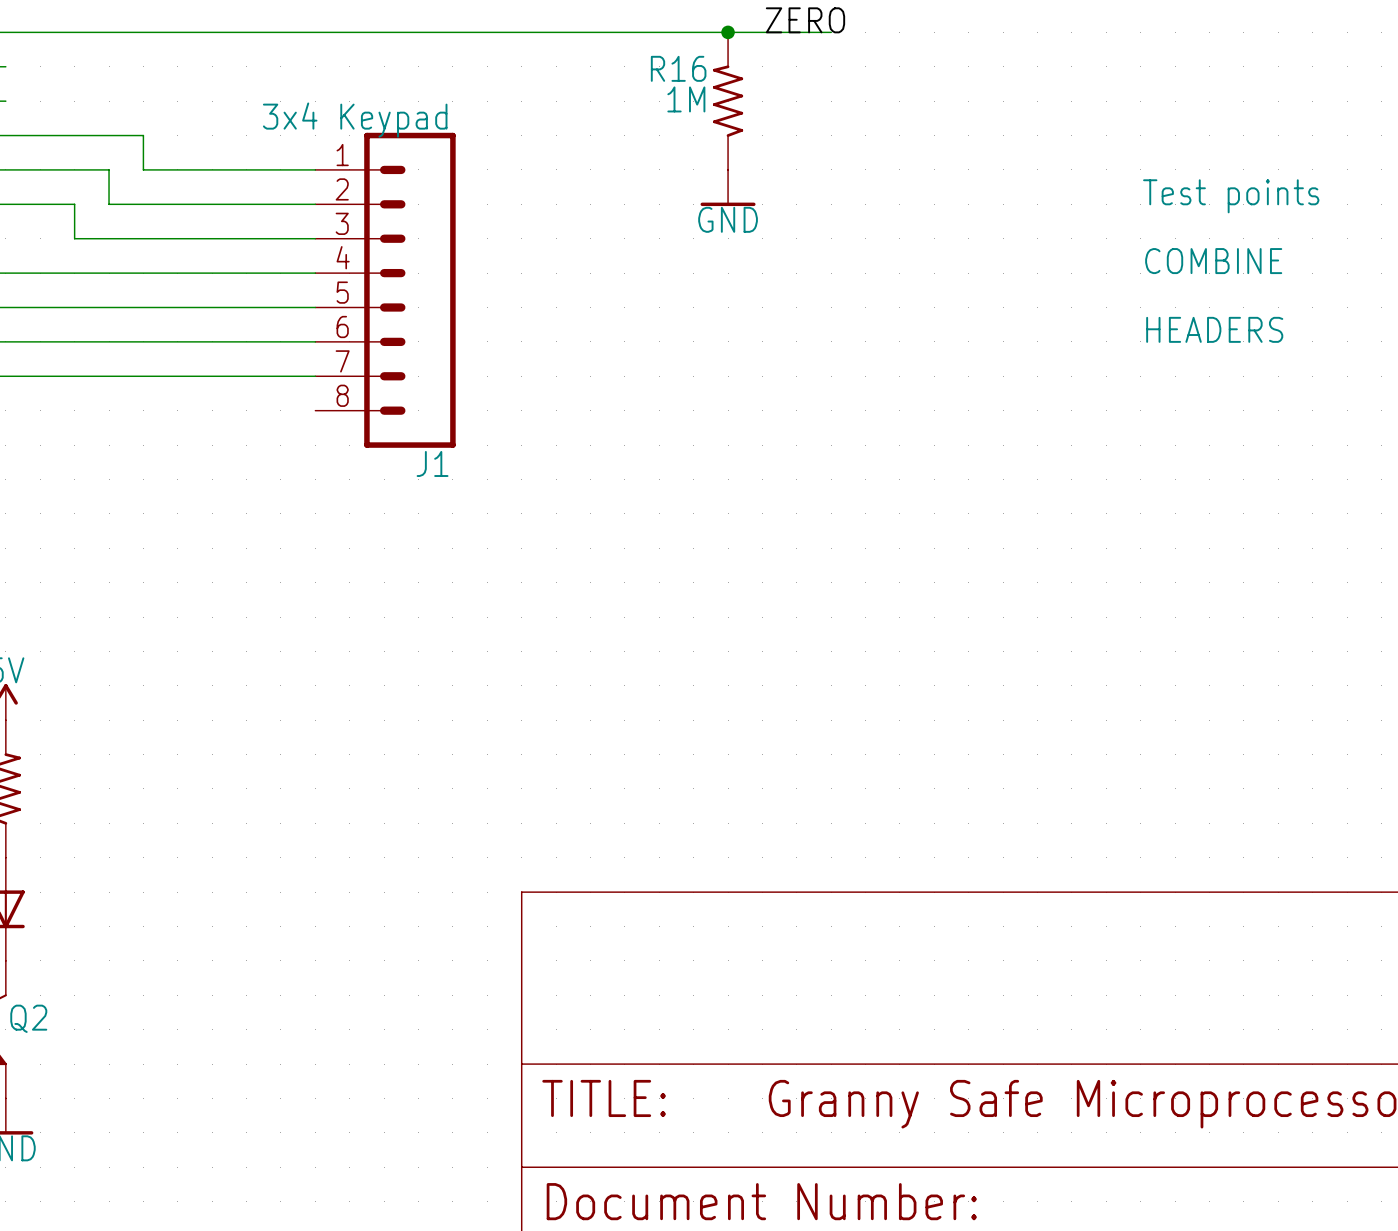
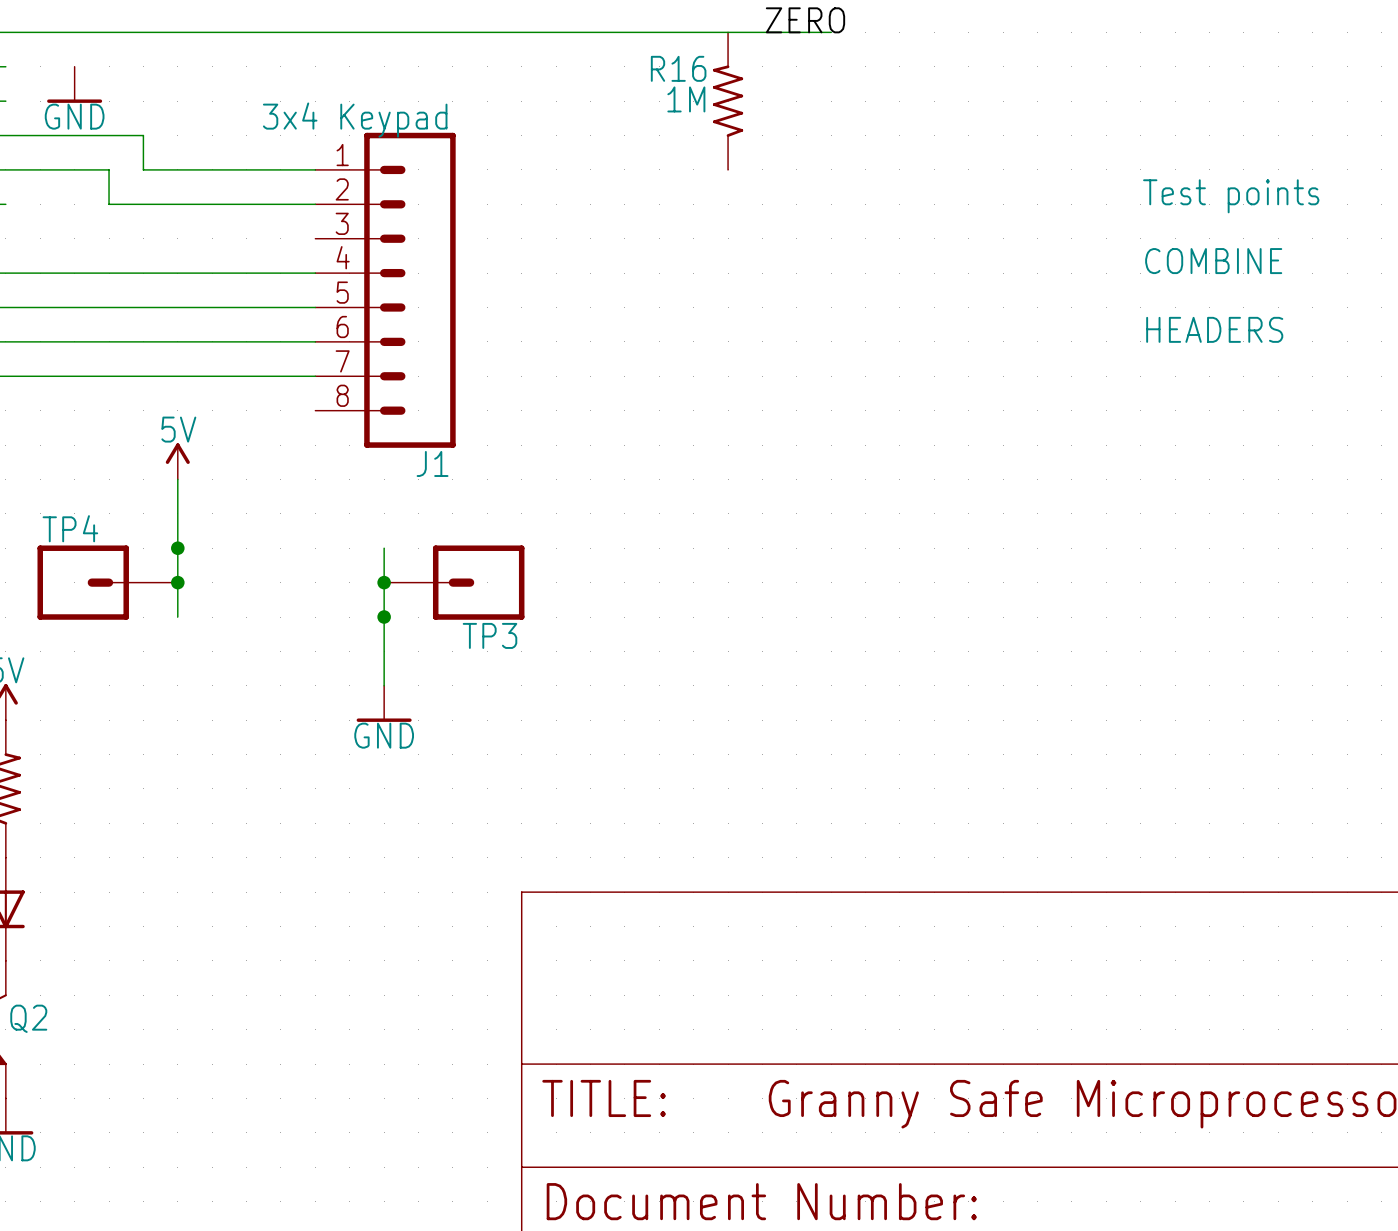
junction: (728, 32) -> none
power symbol: none -> GND (74, 84)
power symbol: GND (728, 187) -> none
wire: (5, 204) (74, 204) (74, 238) (315, 238) -> none
power symbol: none -> 5V (177, 461)
wire: none -> (177, 479) (177, 617)
junction: none -> (177, 548)
wire: none -> (384, 548) (384, 685)
TP4: none -> (107, 582)
junction: none -> (177, 582)
junction: none -> (384, 582)
TP3: none -> (454, 582)
junction: none -> (384, 617)
power symbol: none -> GND (384, 703)

